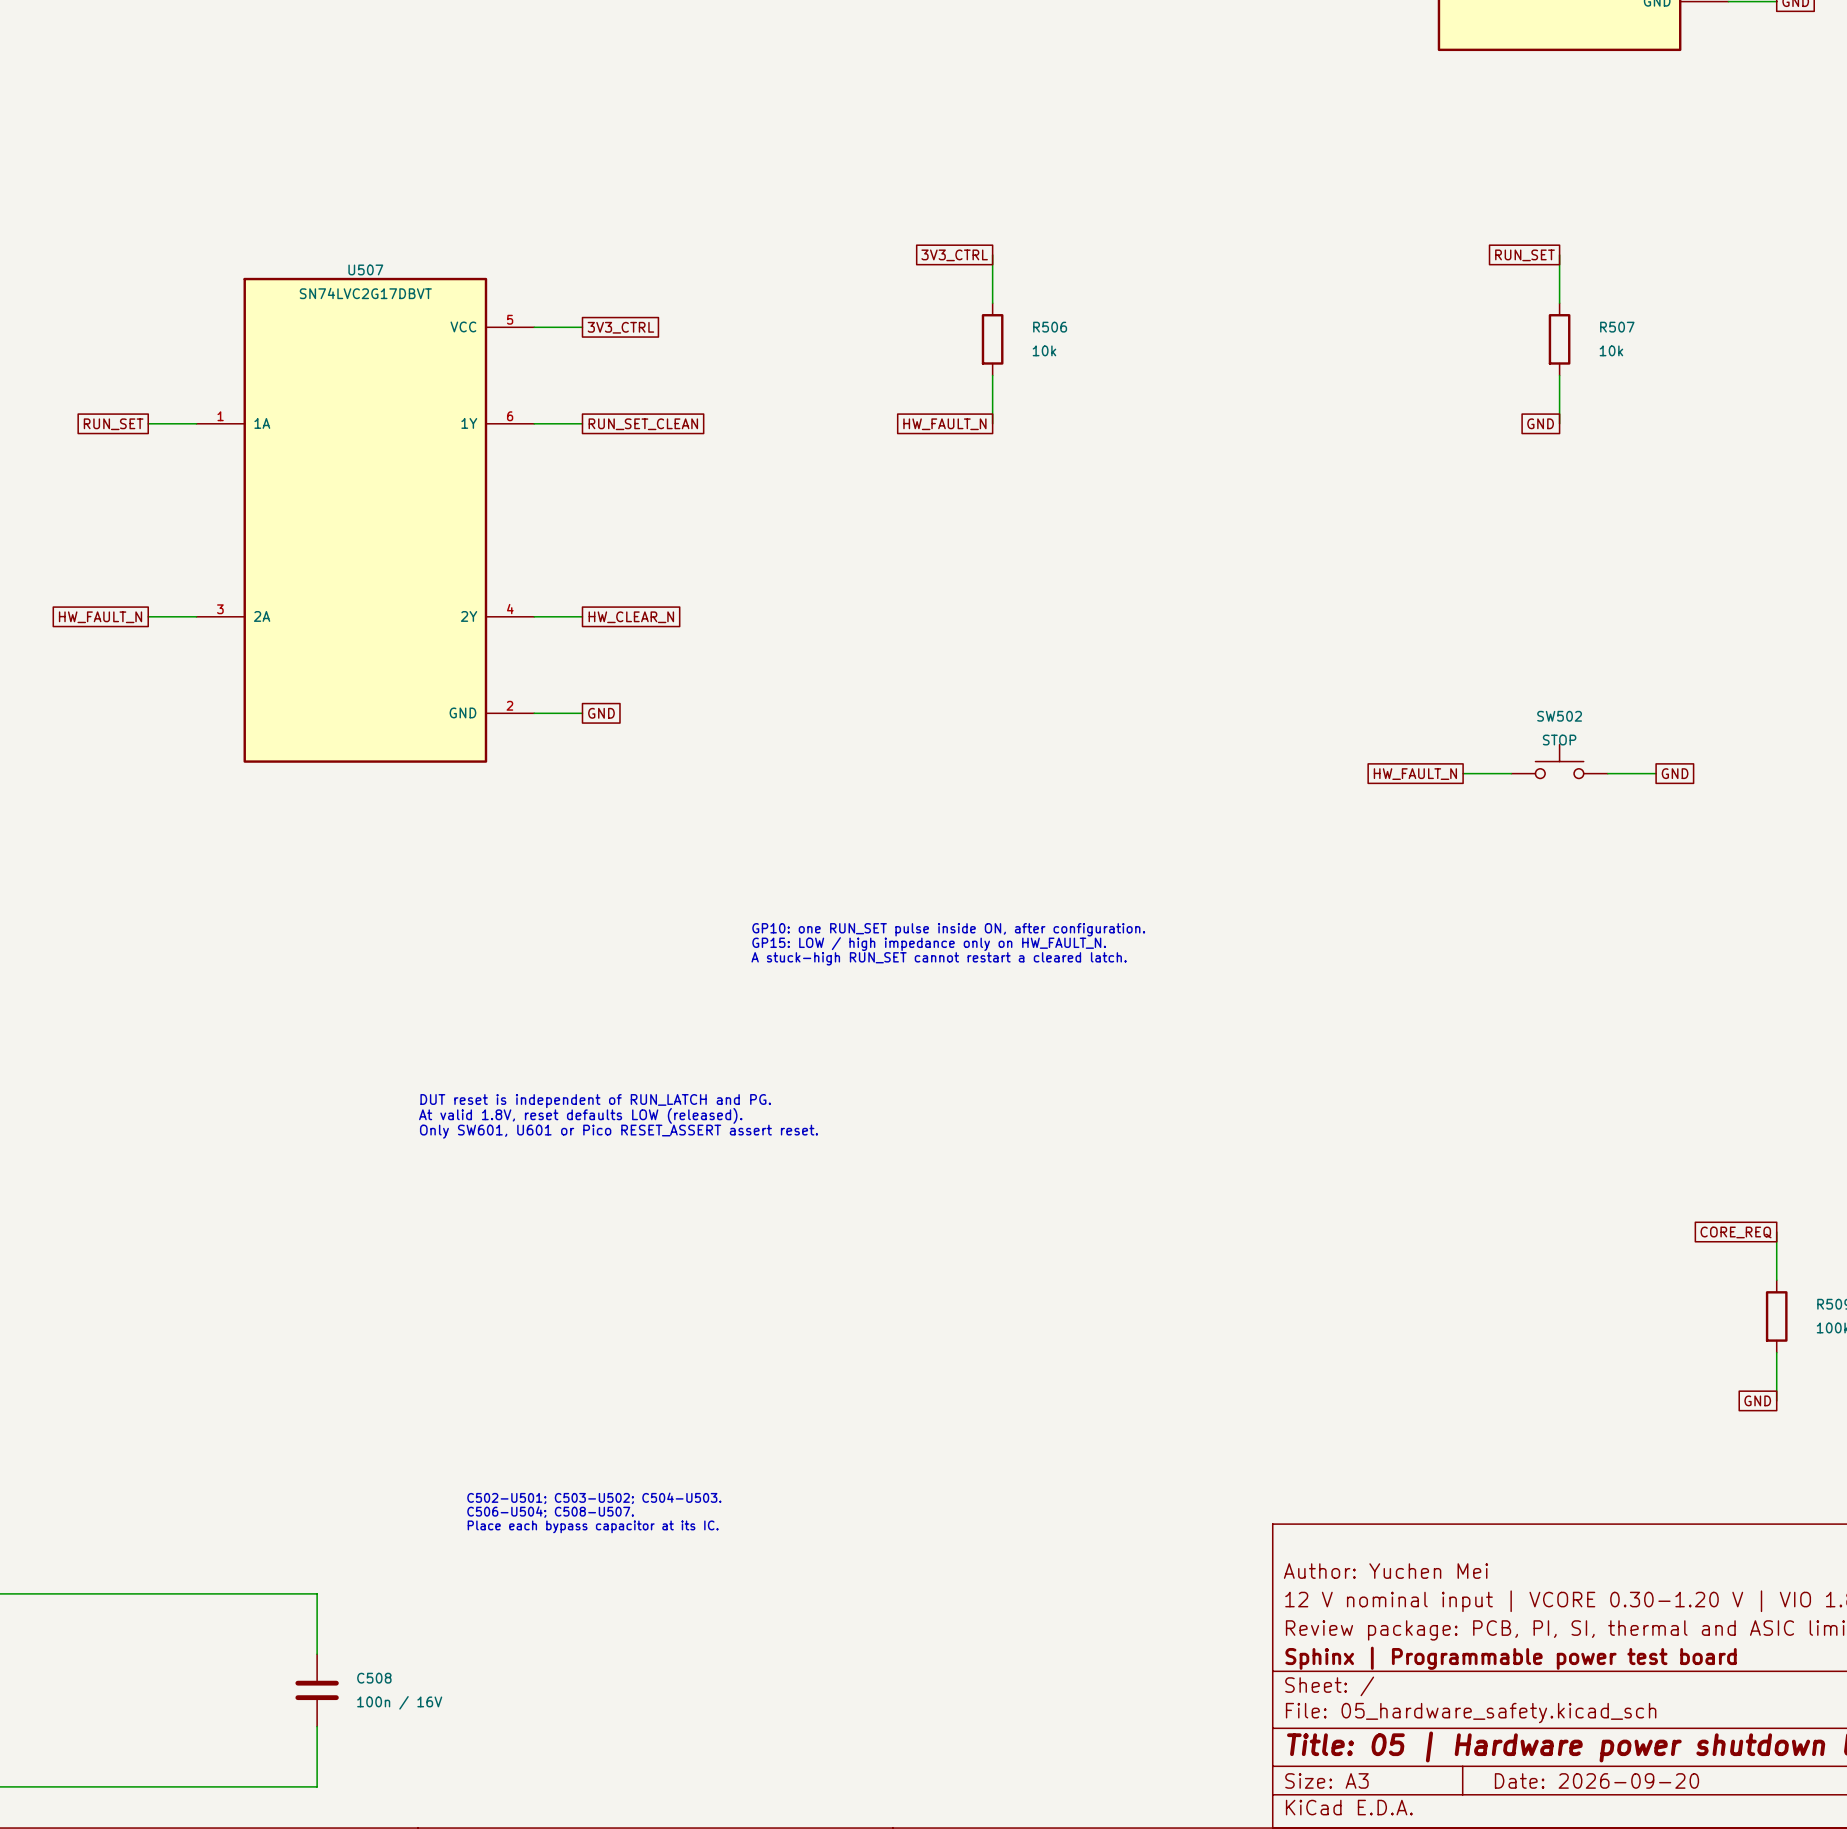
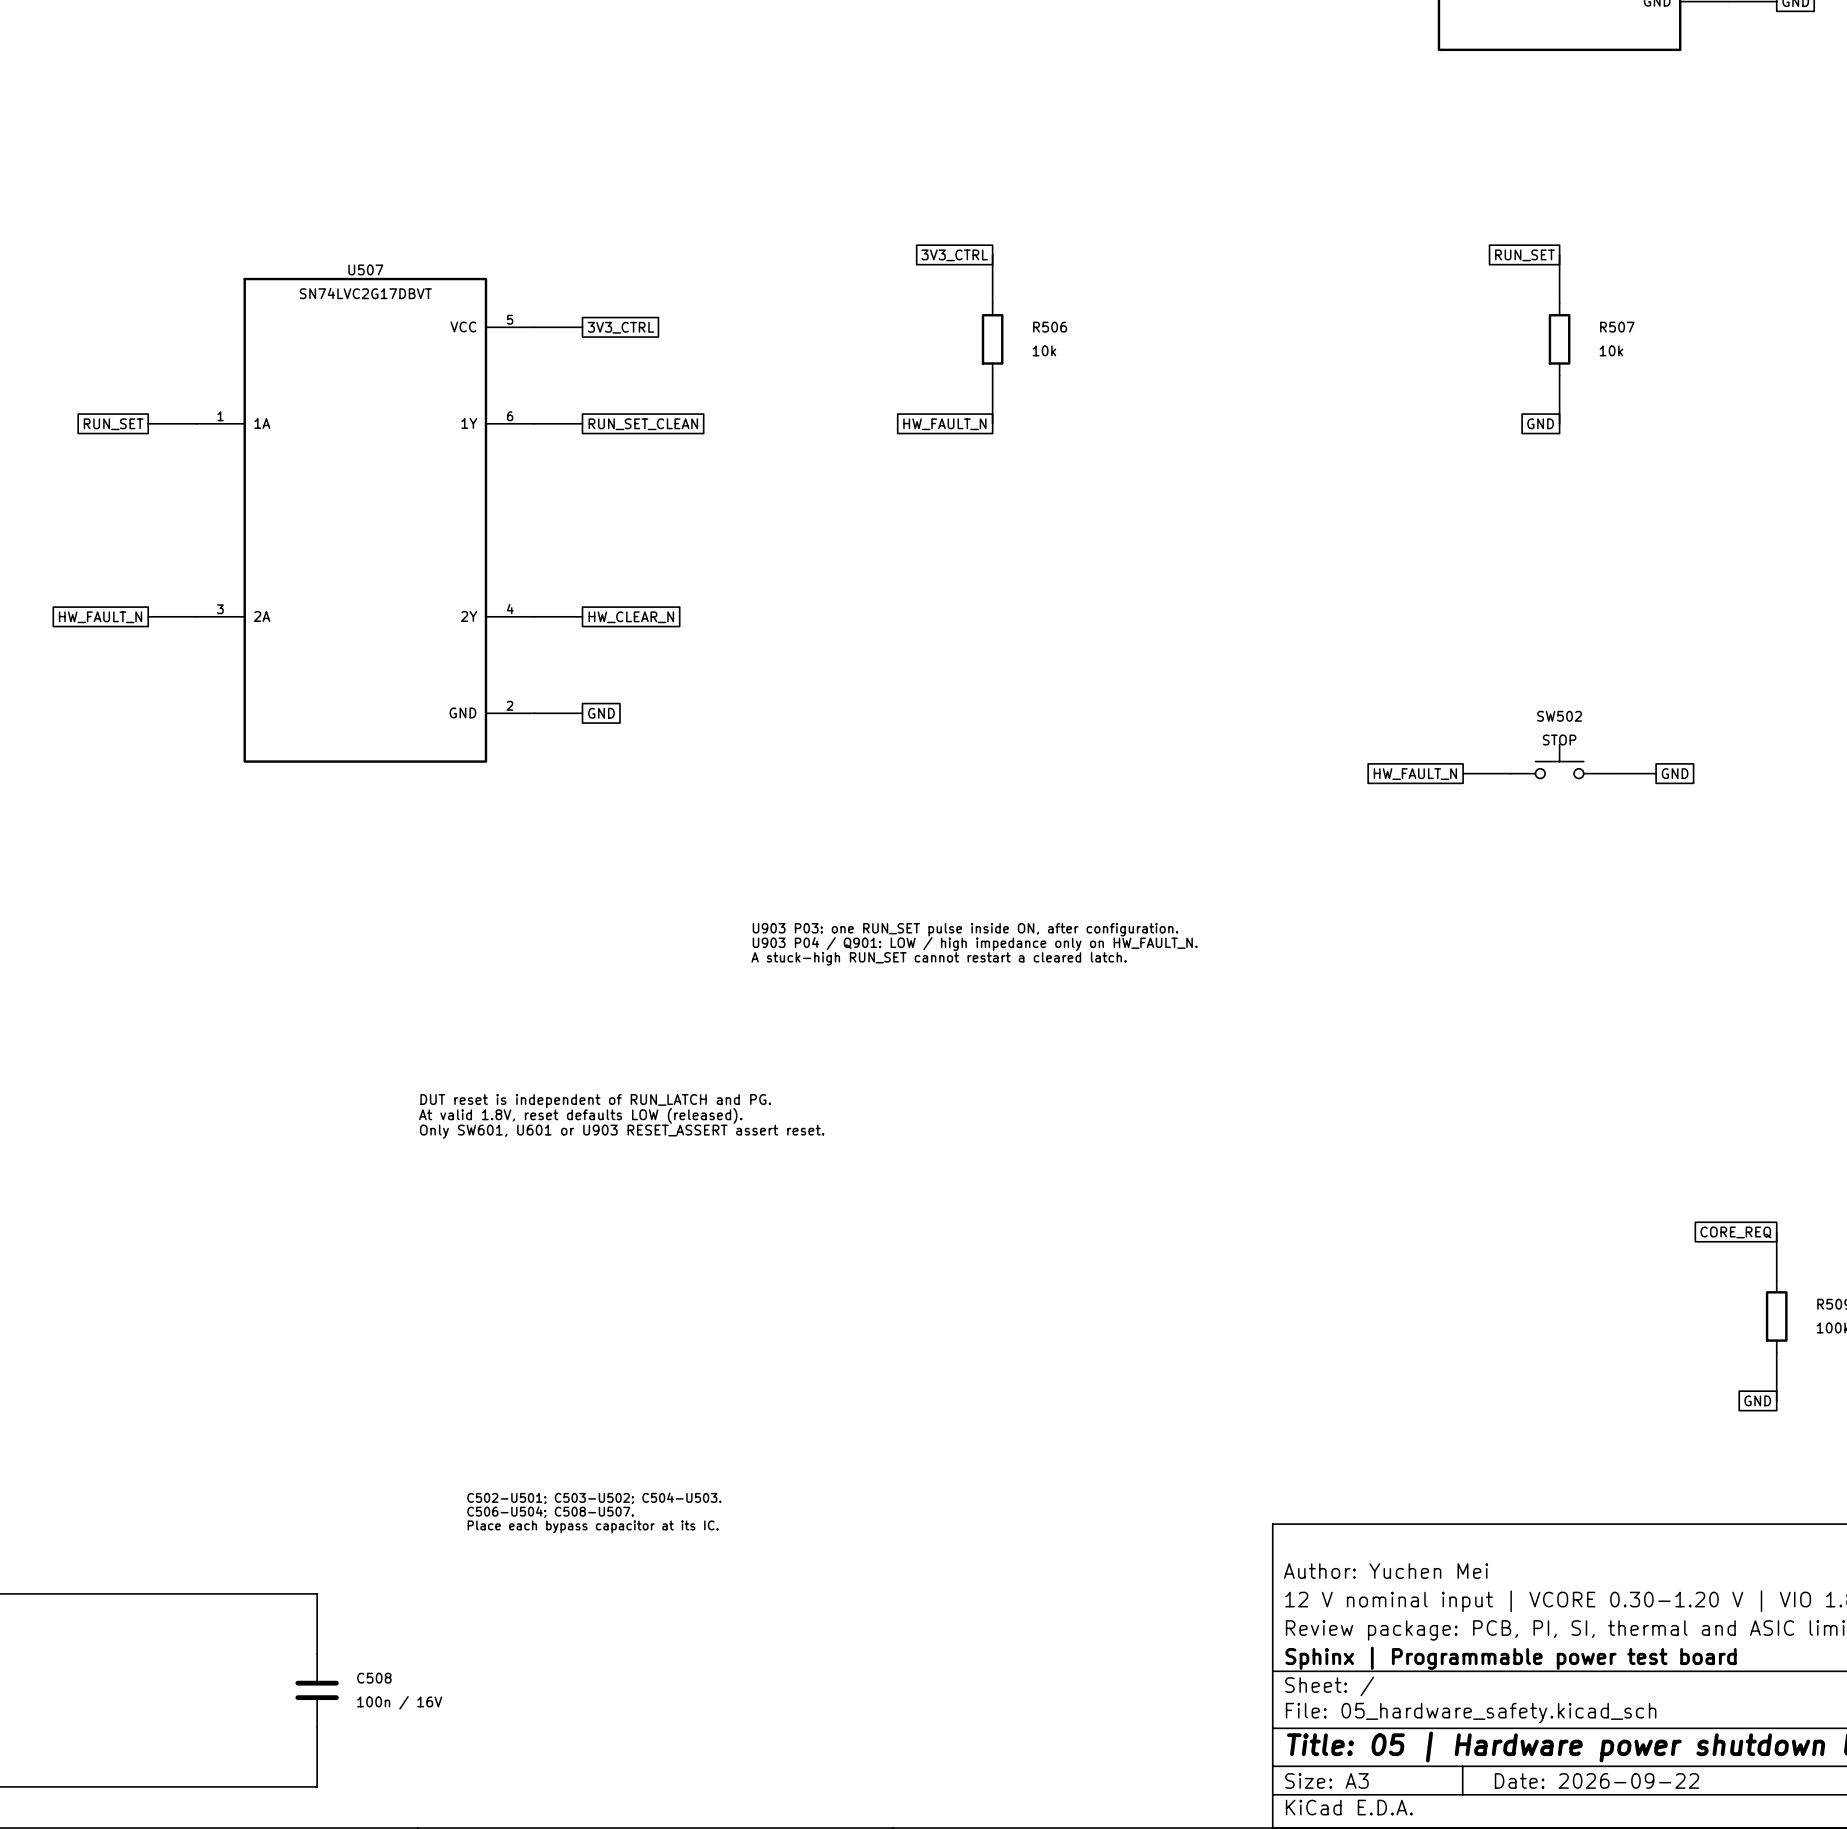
text: GP10: one RUN_SET pulse inside ON, after configuration. (948, 929) -> U903 P03: one RUN_SET pulse inside ON, after configuration. (965, 929)
text: GP15: LOW / high impedance only on HW_FAULT_N. (929, 944) -> U903 P04 / Q901: LOW / high impedance only on HW_FAULT_N. (975, 944)
text: Only SW601, U601 or Pico RESET_ASSERT assert reset. (618, 1131) -> Only SW601, U601 or U903 RESET_ASSERT assert reset. (622, 1131)
title block: Date: 2026-09-20 (1596, 1780) -> Date: 2026-09-22 (1596, 1780)

